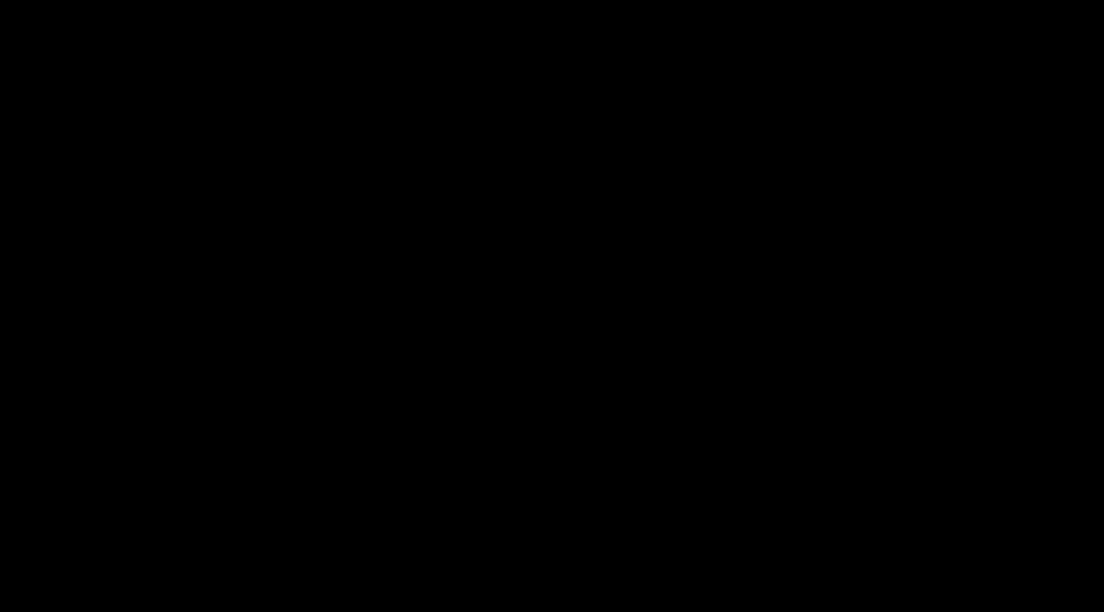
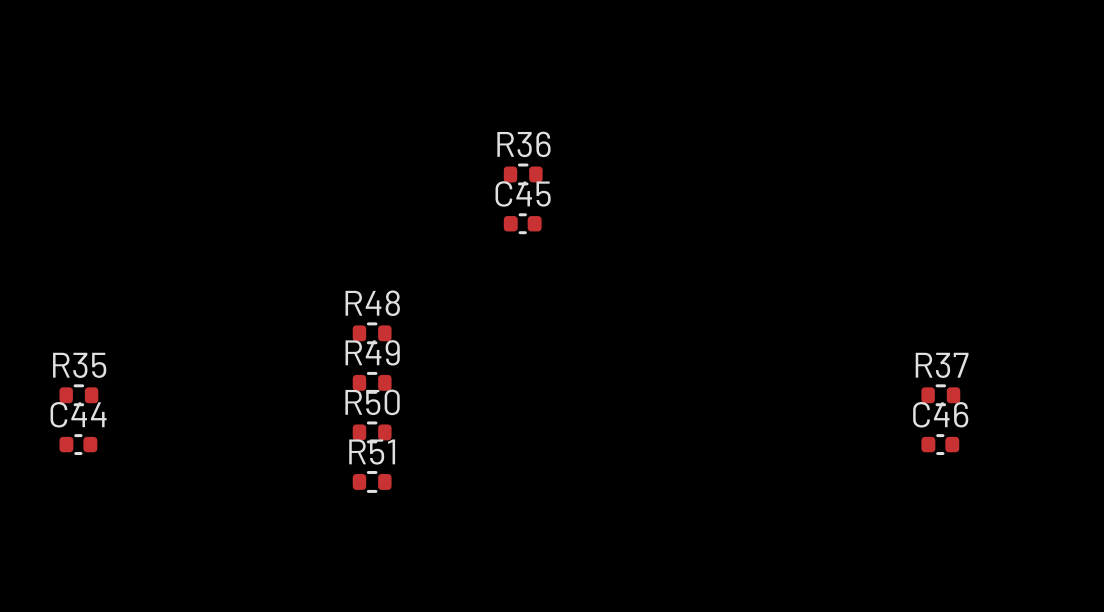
R36: none -> (523, 174)
C45: none -> (522, 223)
R48: none -> (372, 333)
R49: none -> (372, 382)
R35: none -> (78, 395)
R37: none -> (940, 395)
R50: none -> (372, 432)
C44: none -> (78, 444)
C46: none -> (940, 444)
R51: none -> (372, 481)

